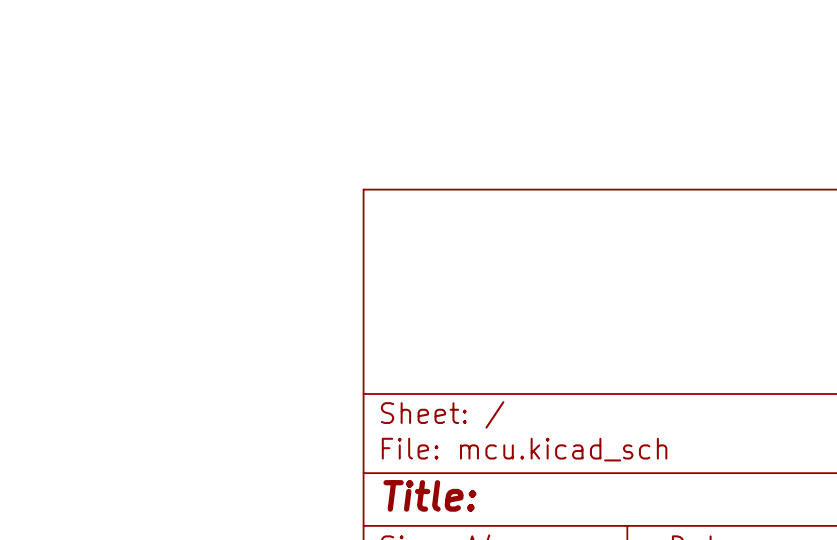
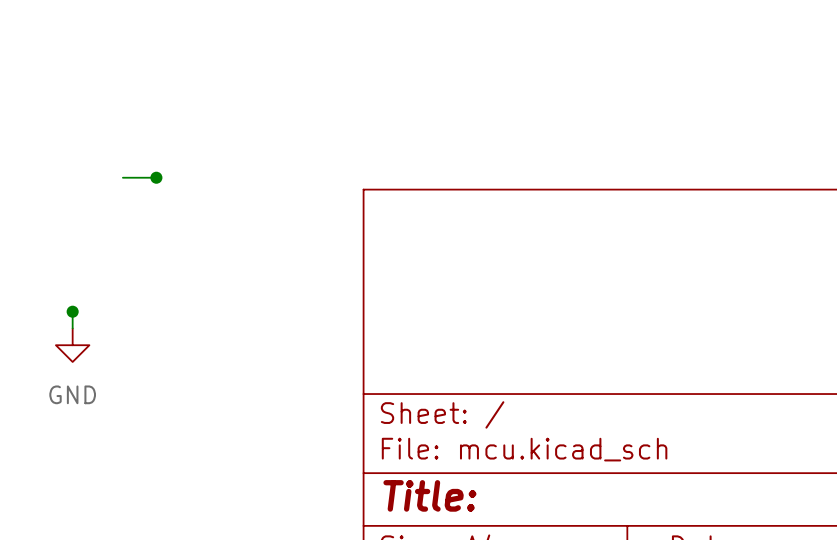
wire: none -> (122, 177) (156, 177)
junction: none -> (156, 177)
wire: none -> (72, 311) (72, 328)
junction: none -> (72, 311)
power symbol: none -> GND (72, 345)

